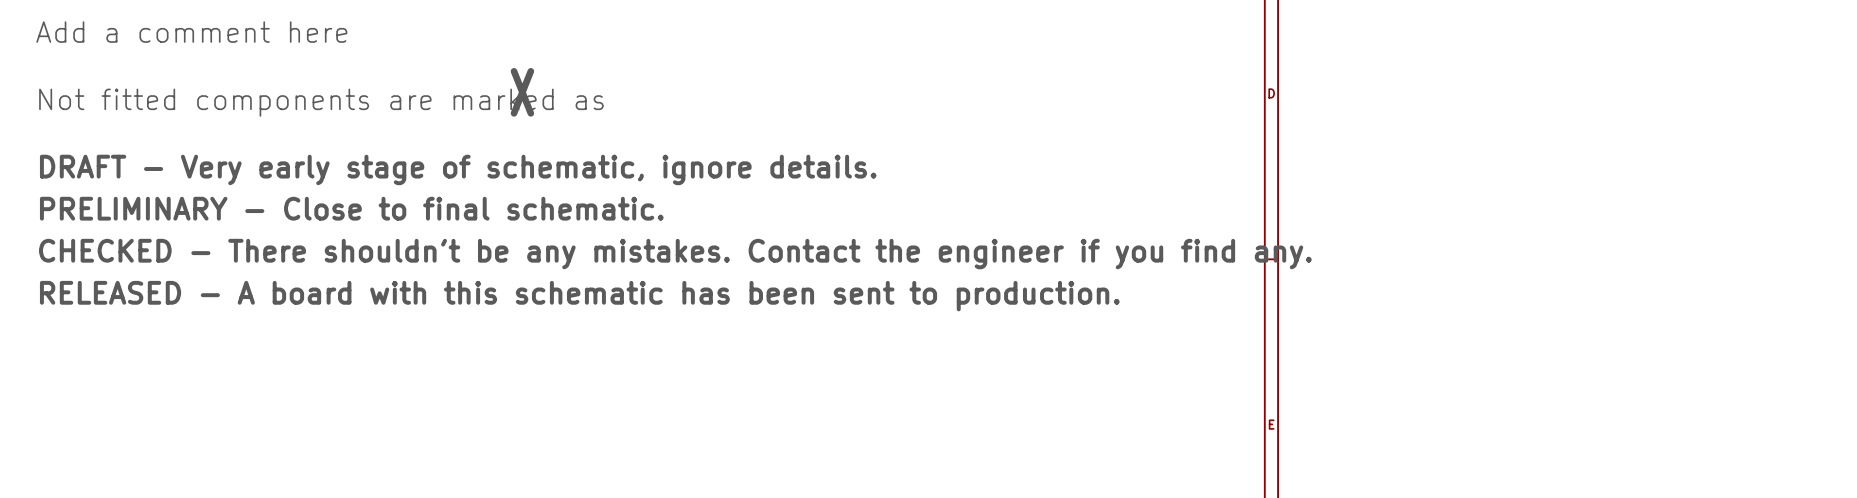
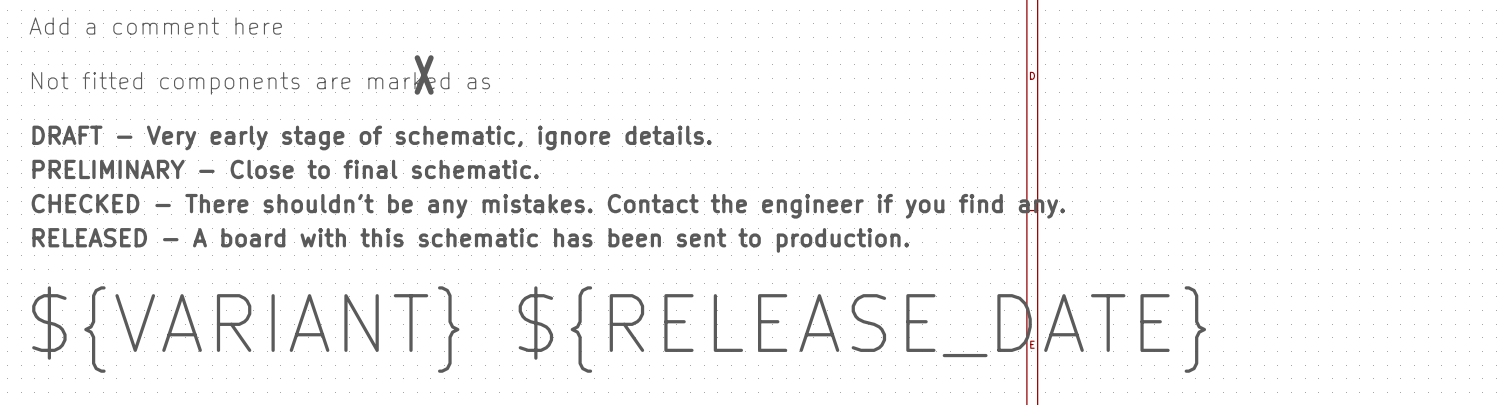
text: none -> ${VARIANT} ${RELEASE_DATE} (619, 329)

